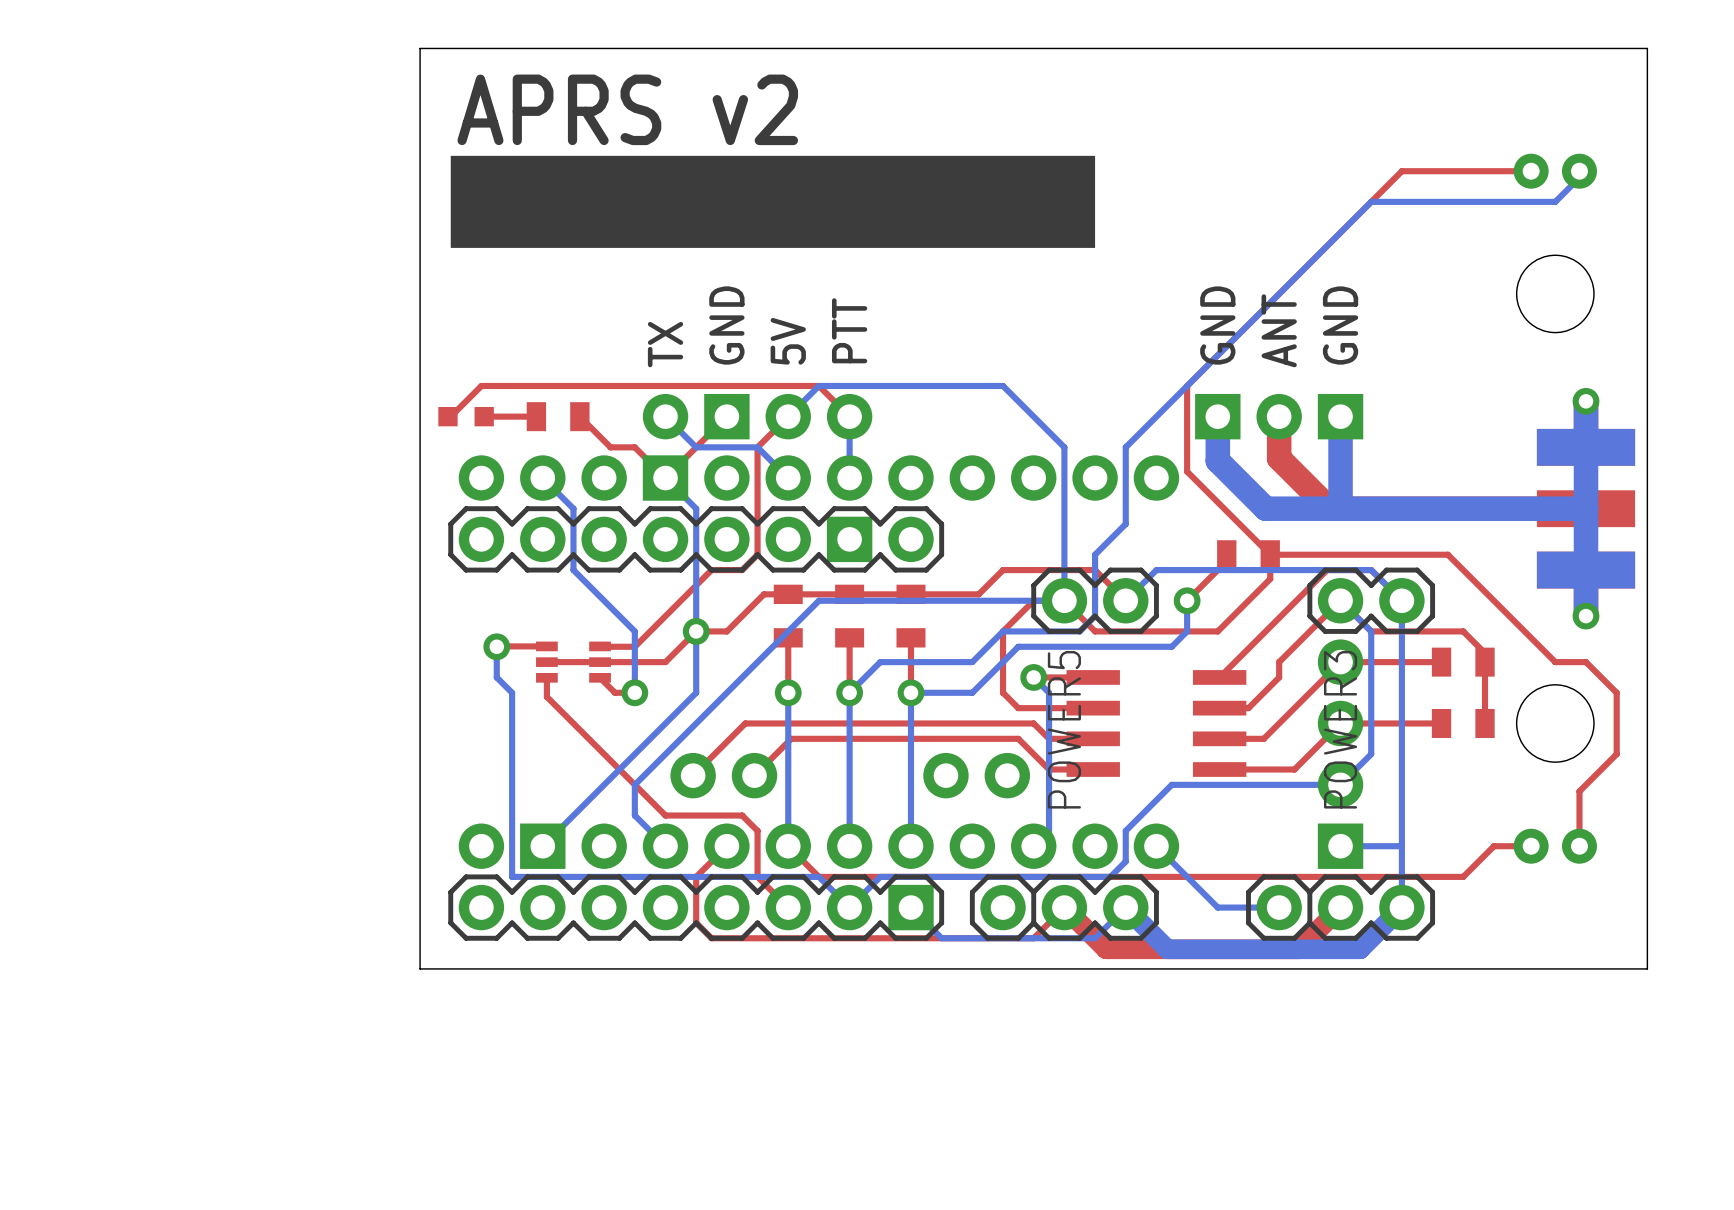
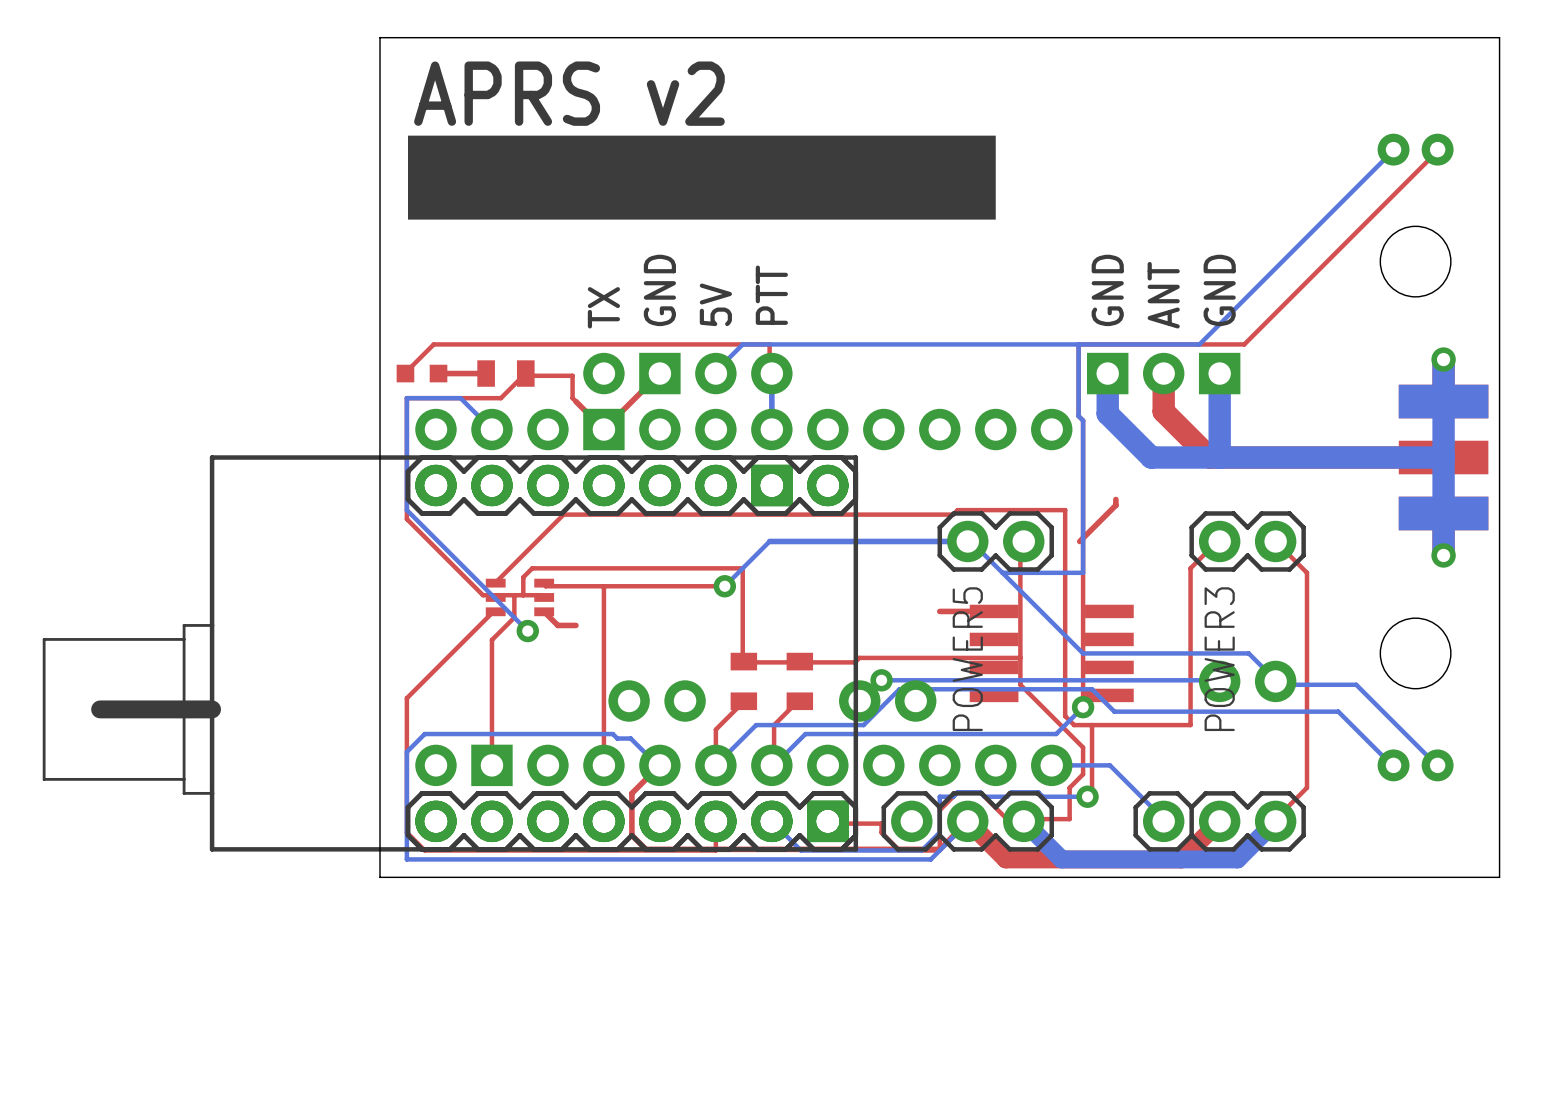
top track: (1531, 171) (1401, 171) (1187, 385) (1187, 471) (1270, 554) -> none
bottom track: (1579, 171) (1579, 177) (1555, 201) (1371, 201) (1125, 447) (1125, 524) (1095, 554) (1095, 616) (1079, 631) (1003, 631) (972, 662) (880, 662) (849, 692) (849, 846) -> (1083, 707) (1056, 734) (805, 734) (774, 765) (771, 765)
top track: none -> (1437, 149) (1244, 344) (1078, 344) (1078, 416) (1083, 420) (1083, 707)
bottom track: none -> (1078, 344) (1078, 416) (1083, 420) (1083, 572) (1002, 572)
top track: (847, 414) (818, 385) (481, 385) (450, 416) (447, 416) -> (769, 371) (769, 344) (433, 344) (405, 373)
top track: (579, 416) (610, 447) (634, 447) -> (544, 597) (541, 595) (496, 595) (495, 597) (491, 595) (483, 595) (406, 519) (406, 398) (500, 398) (525, 373) (527, 375) (572, 375) (572, 398) (575, 401)
bottom track: (665, 416) (696, 447) (757, 447) (788, 478) -> none
bottom track: (788, 416) (818, 385) (1003, 385) (1064, 447) (1064, 600) -> (715, 373) (715, 371) (742, 344) (1199, 344) (1393, 149)
top track: (788, 416) (757, 447) (757, 554) (742, 570) (711, 570) (634, 646) (600, 646) -> (724, 586) (545, 586) (544, 583)
bottom track: (542, 478) (573, 508) (573, 570) (634, 631) (634, 692) -> (491, 429) (460, 398) (406, 398) (406, 510) (527, 631)
bottom track: (665, 478) (696, 508) (696, 692) (542, 846) -> none
part: (1248, 554) -> none
top track: (1270, 554) (1447, 554) (1555, 662) (1586, 662) (1616, 692) (1616, 754) (1579, 791) (1579, 846) -> none
top track: (1270, 554) (1270, 579) (1217, 631) (1095, 631) (1064, 600) (1033, 600) (1003, 631) (1003, 692) (1018, 708) (1093, 708) -> none
bottom track: (847, 600) (818, 600) (634, 784) (634, 815) (665, 846) -> (769, 541) (724, 586)
bottom track: (1125, 600) (1156, 570) (1371, 570) (1401, 600) (1401, 752) -> (967, 541) (971, 541) (1083, 653) (1248, 653) (1275, 680)
top track: (1125, 600) (1095, 570) (1003, 570) (978, 594) (763, 594) (726, 631) (696, 631) (665, 662) (546, 662) -> (1023, 541) (1020, 541) (1020, 684) (1083, 747) (1083, 774) (1069, 787) (1069, 819) (1024, 819) (1023, 821) (1020, 819) (1006, 819) (980, 792) (957, 792) (939, 810) (939, 850) (899, 850) (881, 832) (881, 823) (827, 823) (827, 821)
bottom track: (1187, 600) (1187, 631) (1171, 646) (1018, 646) (972, 692) (910, 692) (910, 846) -> none
via: (1187, 600) -> none
bottom track: (1340, 600) (1371, 631) (1371, 754) (1340, 784) (1171, 784) (1125, 830) (1125, 861) (1110, 876) (880, 876) (849, 907) (818, 876) (512, 876) (512, 692) (496, 677) (496, 646) -> none
top track: (1401, 600) (1371, 570) (1327, 570) (1219, 677) -> (1275, 541) (1306, 572) (1306, 787) (1275, 819) (1275, 821)
part: (788, 616) -> none
part: (849, 616) -> none
part: (910, 616) -> none
via: (696, 631) -> none
top track: (788, 637) (788, 692) -> none
top track: (849, 637) (849, 692) -> none
top track: (910, 637) (910, 692) -> none
via: (496, 646) -> none
top track: (546, 646) (496, 646) -> (495, 583) (563, 514) (953, 514) (957, 510) (1065, 510) (1065, 716) (1074, 725) (1190, 725) (1190, 568) (1217, 541) (1219, 541)
top track: none -> (603, 586) (603, 765)
via: none -> (724, 586)
top track: none -> (514, 595) (514, 617) (491, 640) (491, 765)
top track: none -> (523, 595) (523, 577) (532, 568) (742, 568) (743, 661) (854, 662) (859, 657) (1020, 657)
top track: (1441, 662) (1340, 662) (1263, 738) (1219, 738) -> none
part: (1463, 662) -> none
top track: (546, 677) (546, 696) (665, 815) (742, 815) (757, 830) (757, 876) (788, 907) -> (495, 611) (491, 613) (406, 698) (406, 832) (424, 850) (715, 850) (715, 821)
bottom track: (1033, 677) (1049, 692) (1049, 830) (1033, 846) -> none
via: (1033, 677) -> none
via: (634, 692) -> none
bottom track: (788, 692) (788, 846) -> (1393, 765) (1338, 711) (1114, 711) (1092, 689) (899, 689) (863, 725) (756, 725) (715, 765)
via: (788, 692) -> none
via: (849, 692) -> none
via: (910, 692) -> none
via: none -> (527, 631)
top track: (1219, 708) (1248, 708) (1279, 677) (1279, 662) (1340, 600) (1371, 631) (1463, 631) (1485, 653) (1485, 723) -> none
part: none -> (450, 653)
top track: (1441, 723) (1340, 723) (1294, 769) (1219, 769) -> none
part: (1463, 723) -> none
top track: (1093, 738) (1049, 738) (1033, 723) (745, 723) (693, 775) -> none
bottom track: none -> (881, 680) (1219, 681)
via: none -> (881, 680)
part: none -> (743, 681)
part: none -> (799, 681)
part: (1340, 754) -> none
part: none -> (1247, 681)
bottom track: (1401, 757) (1401, 907) -> (1275, 684) (1356, 684) (1437, 765)
top track: (1093, 769) (1049, 769) (1018, 738) (791, 738) (754, 775) -> none
top track: none -> (799, 701) (774, 725) (774, 765) (771, 765)
via: none -> (1083, 707)
top track: none -> (1092, 725) (1092, 792) (1087, 796)
bottom track: none -> (659, 765) (657, 765) (630, 738) (617, 738) (612, 734) (424, 734) (406, 751) (406, 859) (930, 859) (967, 821)
bottom track: (1156, 846) (1217, 907) (1279, 907) -> (1051, 765) (1109, 765) (1163, 819) (1163, 821)
bottom track: (1401, 846) (1340, 846) -> none
top track: (1531, 846) (1493, 846) (1463, 876) (818, 876) (788, 846) -> (743, 701) (715, 729) (715, 765)
bottom track: none -> (1087, 796) (1042, 796) (1038, 792) (1011, 792) (1006, 796) (984, 796) (980, 792) (957, 792) (953, 796) (939, 796) (939, 832) (921, 850) (800, 850) (771, 821)
via: none -> (1087, 796)
bottom track: (1125, 907) (1095, 938) (941, 938) (910, 907) -> none

